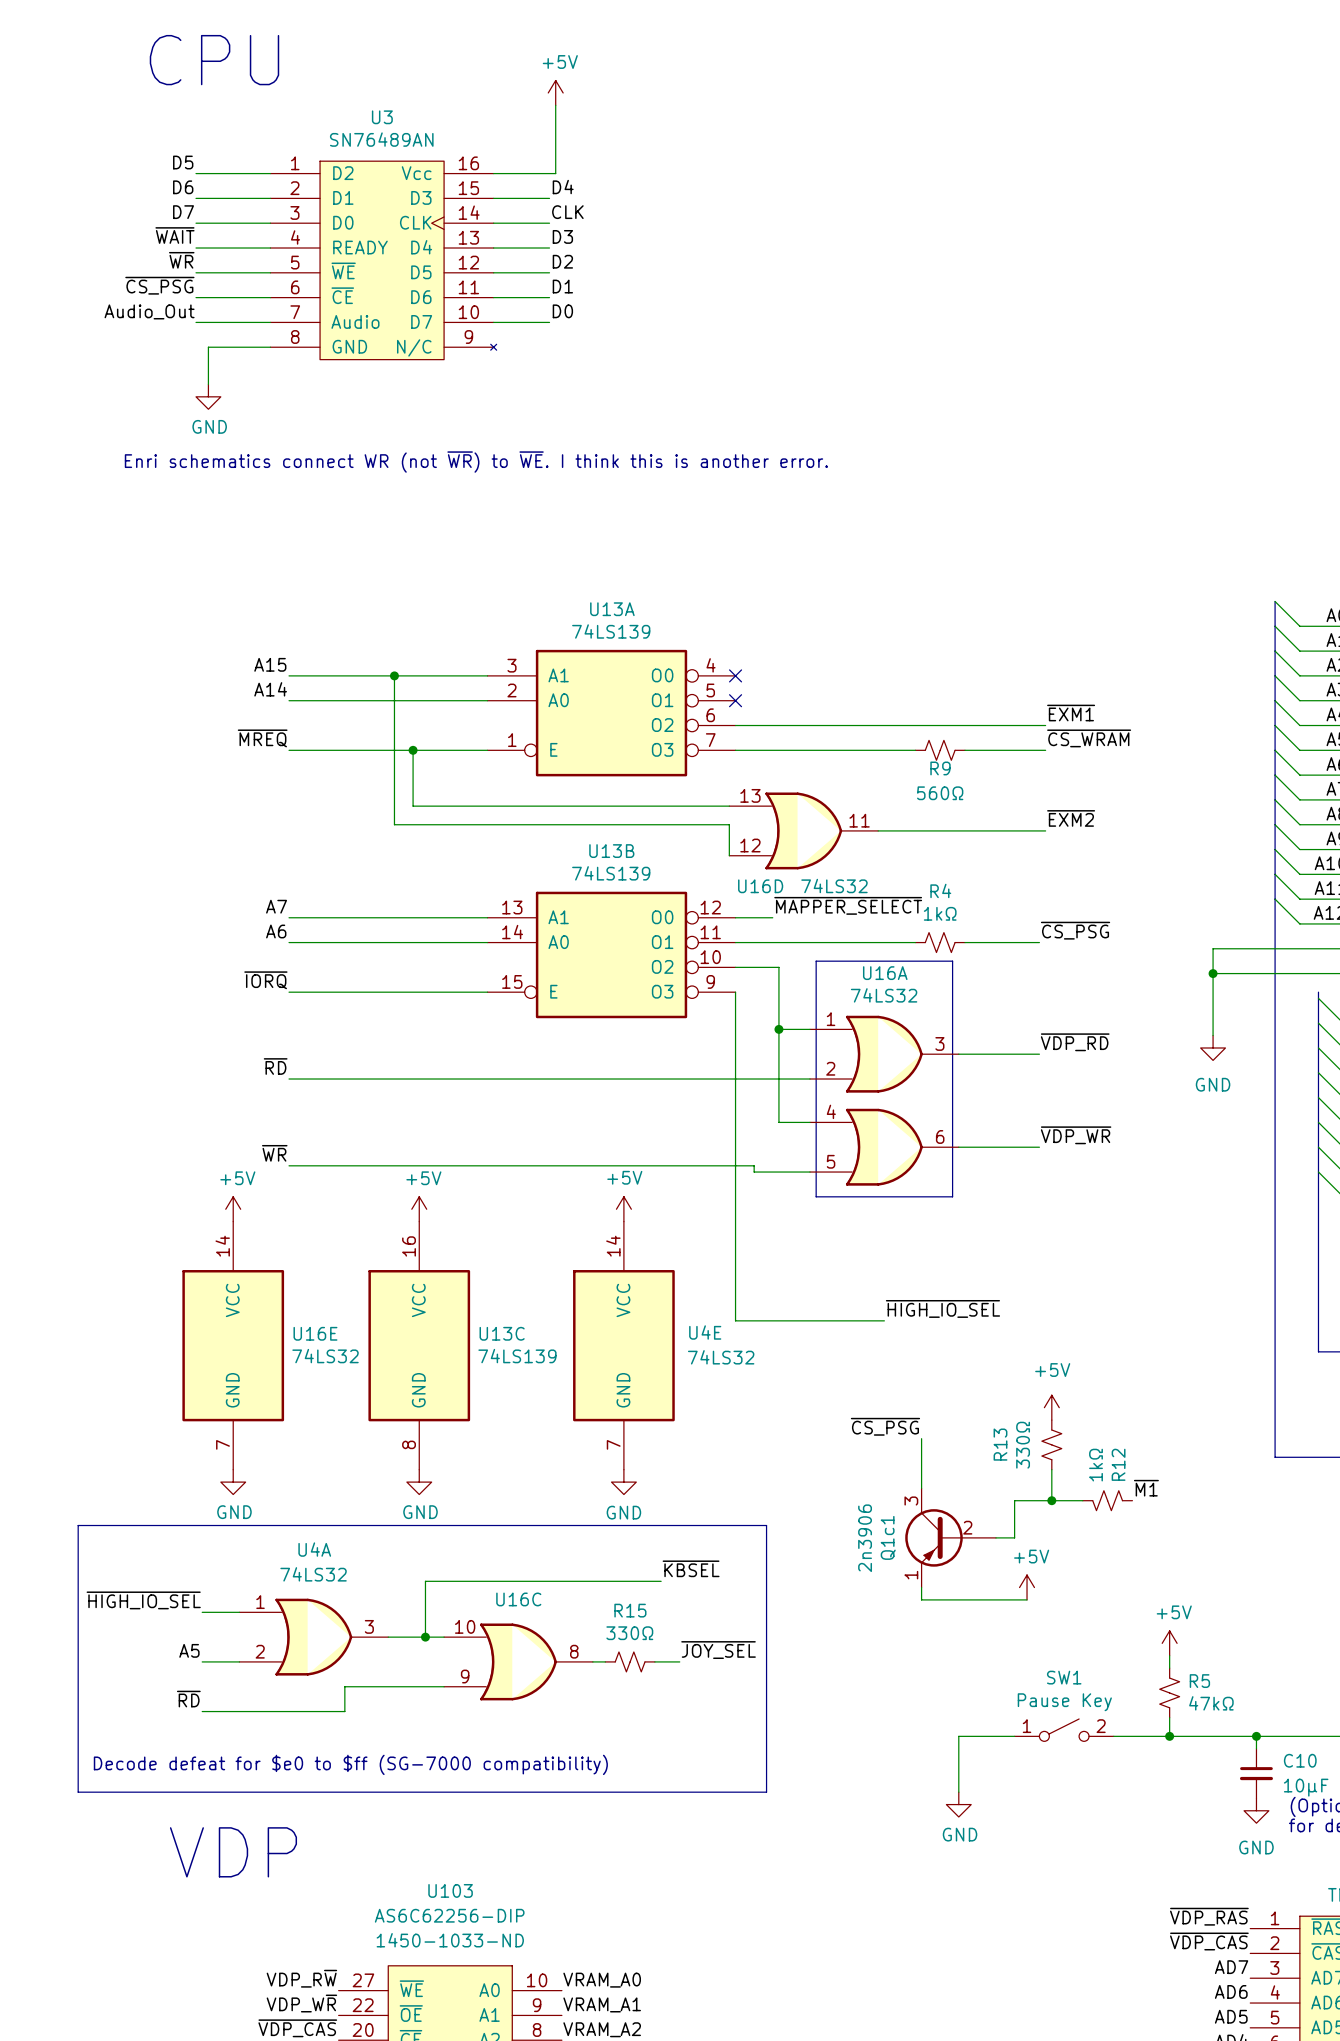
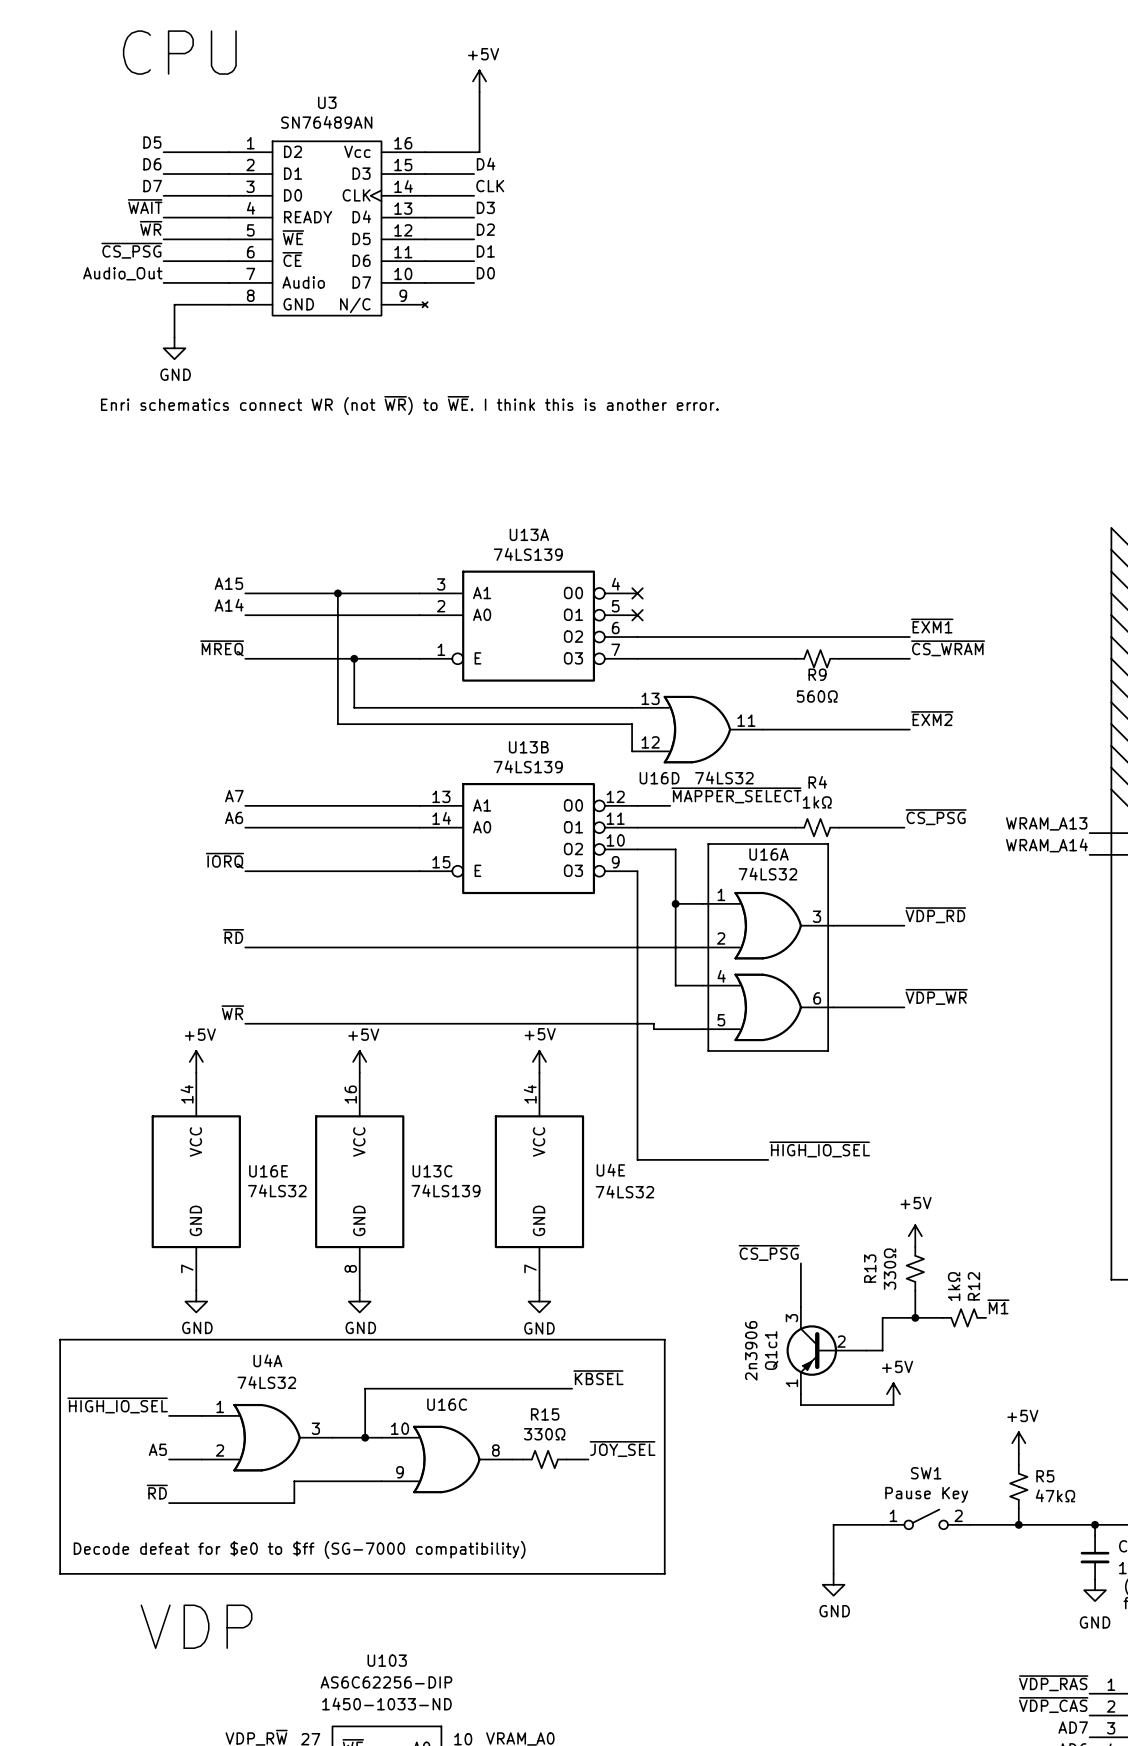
label: none -> WRAM_A13 (1046, 823)
wire: (1250, 948) (1213, 948) (1213, 1035) -> none
label: none -> WRAM_A14 (1046, 845)
wire: (1213, 973) (1250, 973) -> none
junction: (1213, 973) -> none
power symbol: GND (1213, 1047) -> none

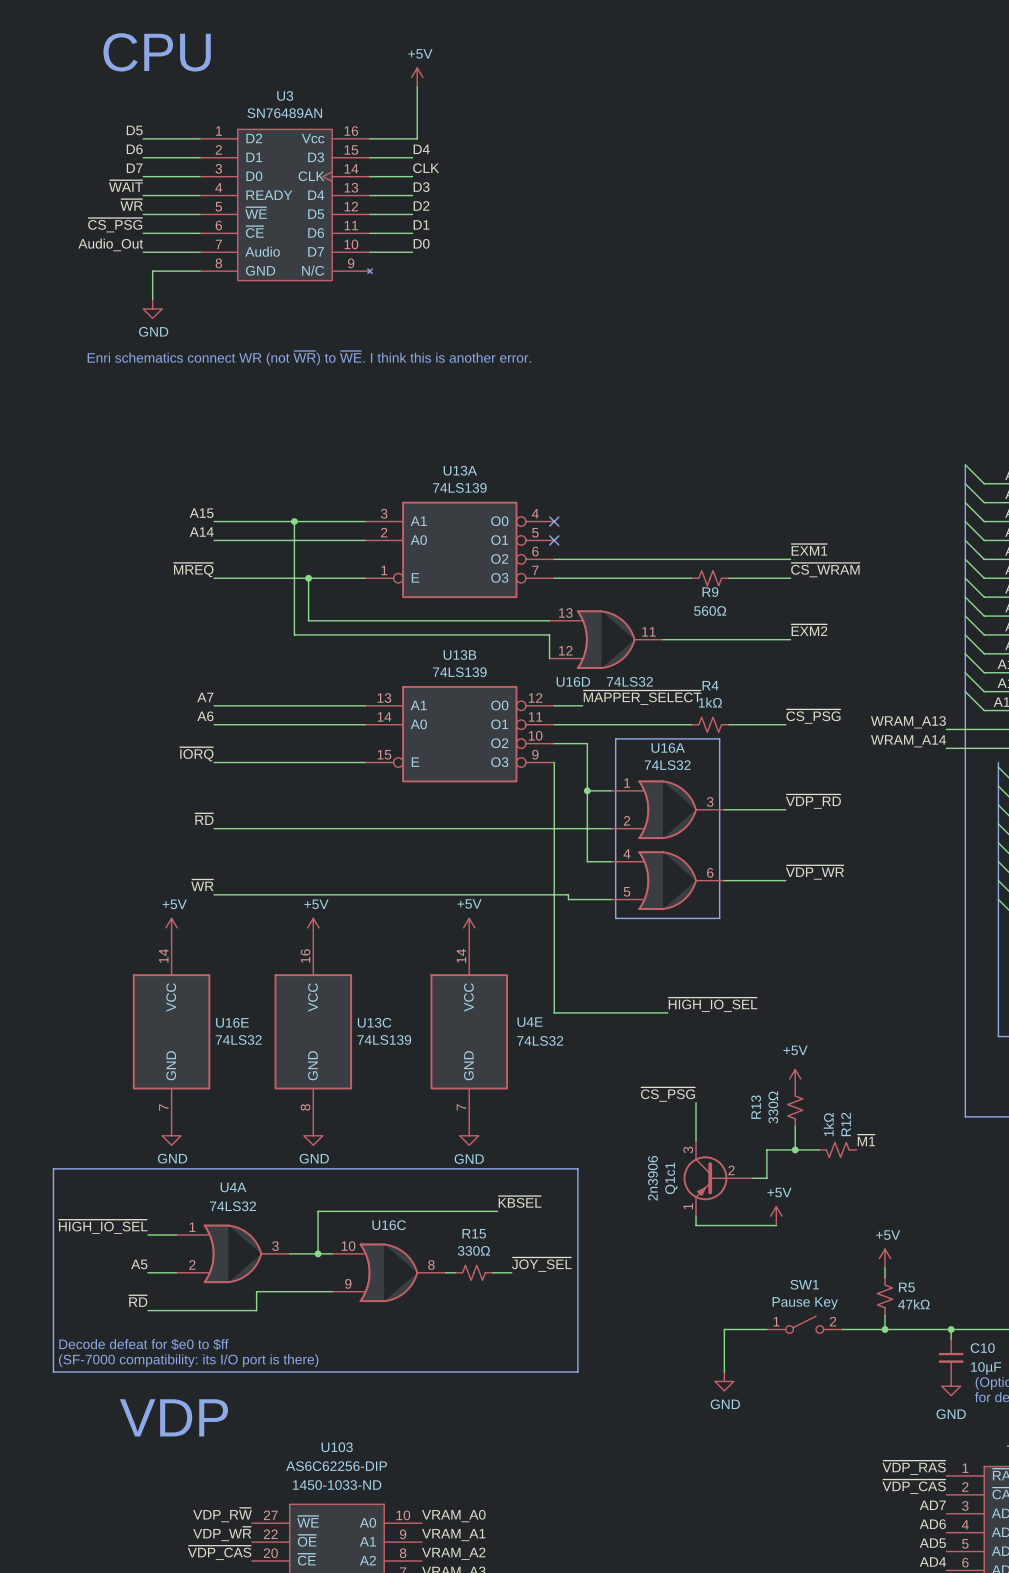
text: Decode defeat for $e0 to $ff (SG-7000 compatibility) (299, 1549) -> Decode defeat for $e0 to $ff (143, 1344)
text: none -> (SF-7000 compatibility: its I/O port is there) (188, 1360)

